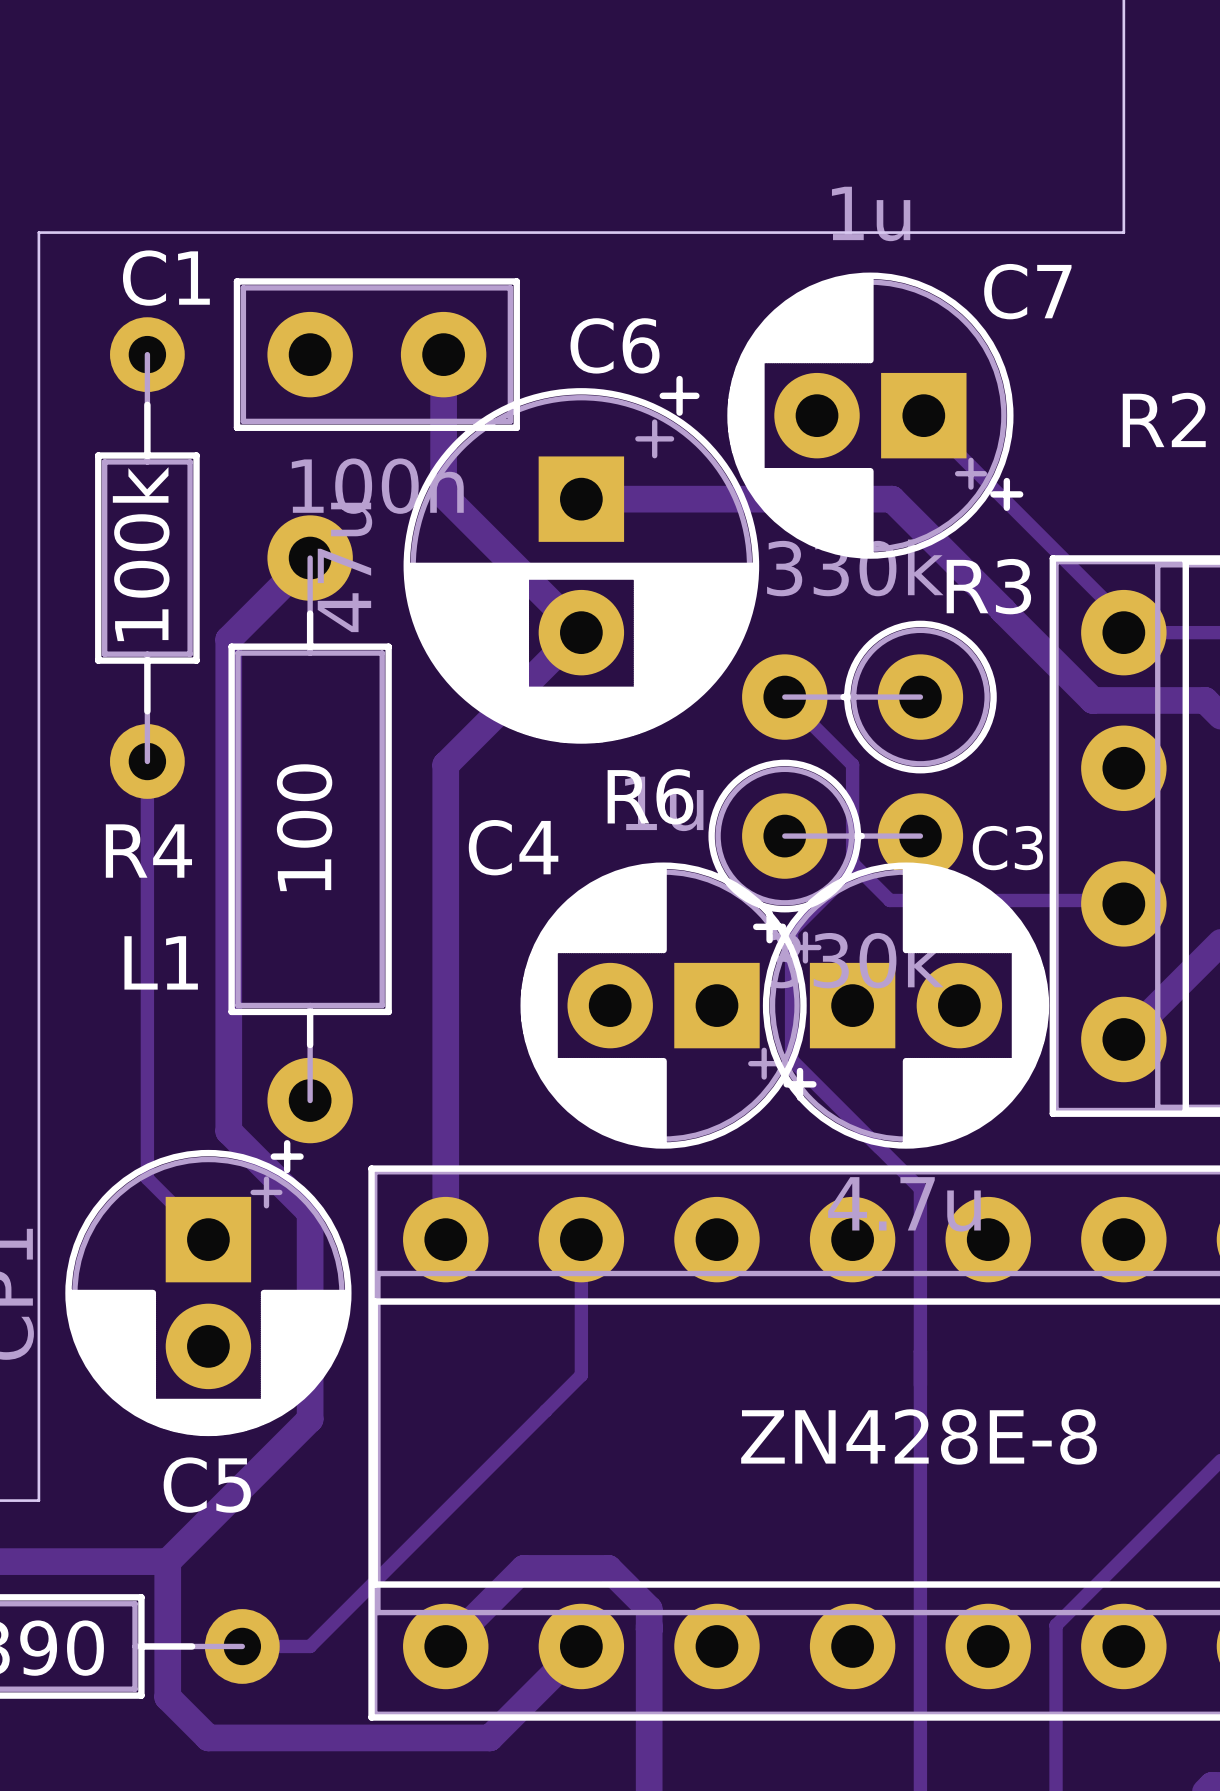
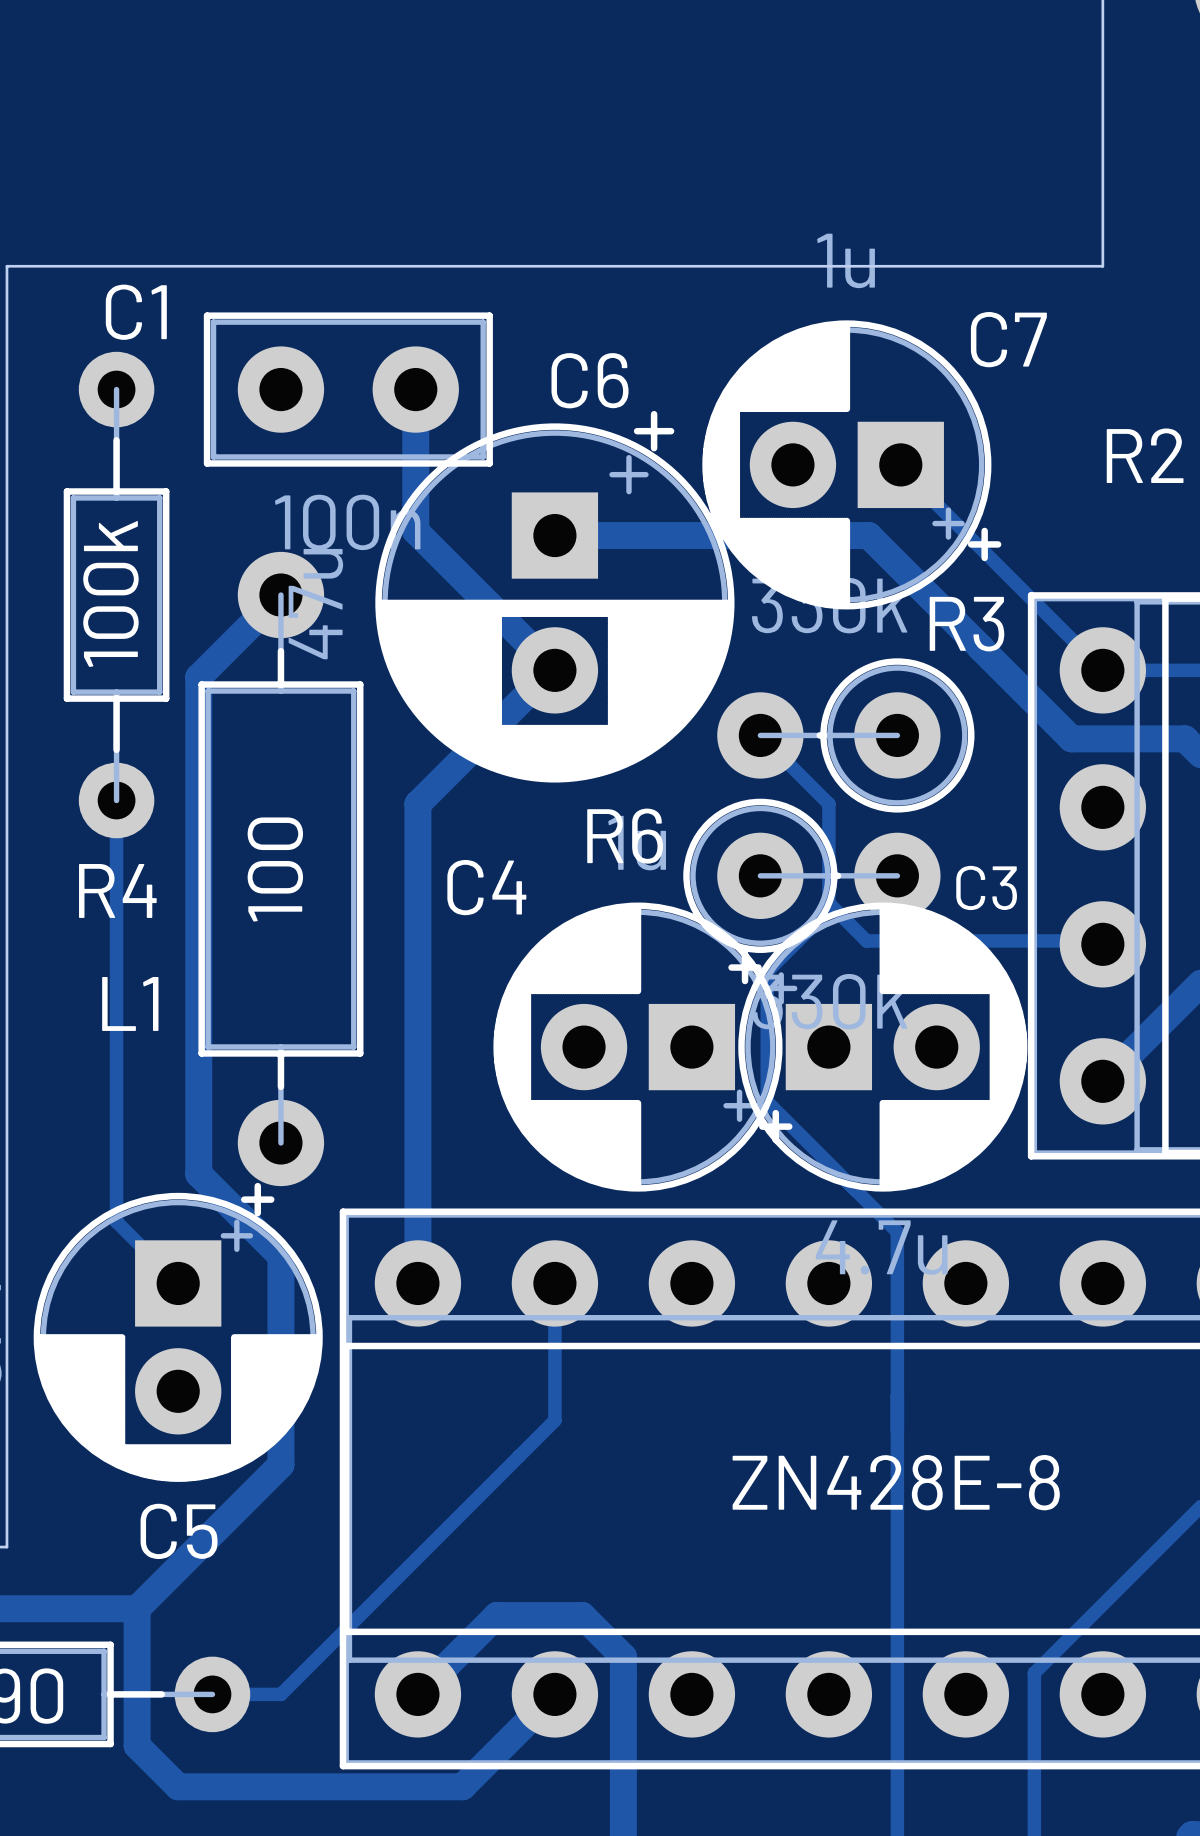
C7 position: (875, 415) -> (851, 464)
track: (923, 415) (923, 419) (1123, 619) (1123, 632) -> (900, 464) (900, 468) (1102, 670)

